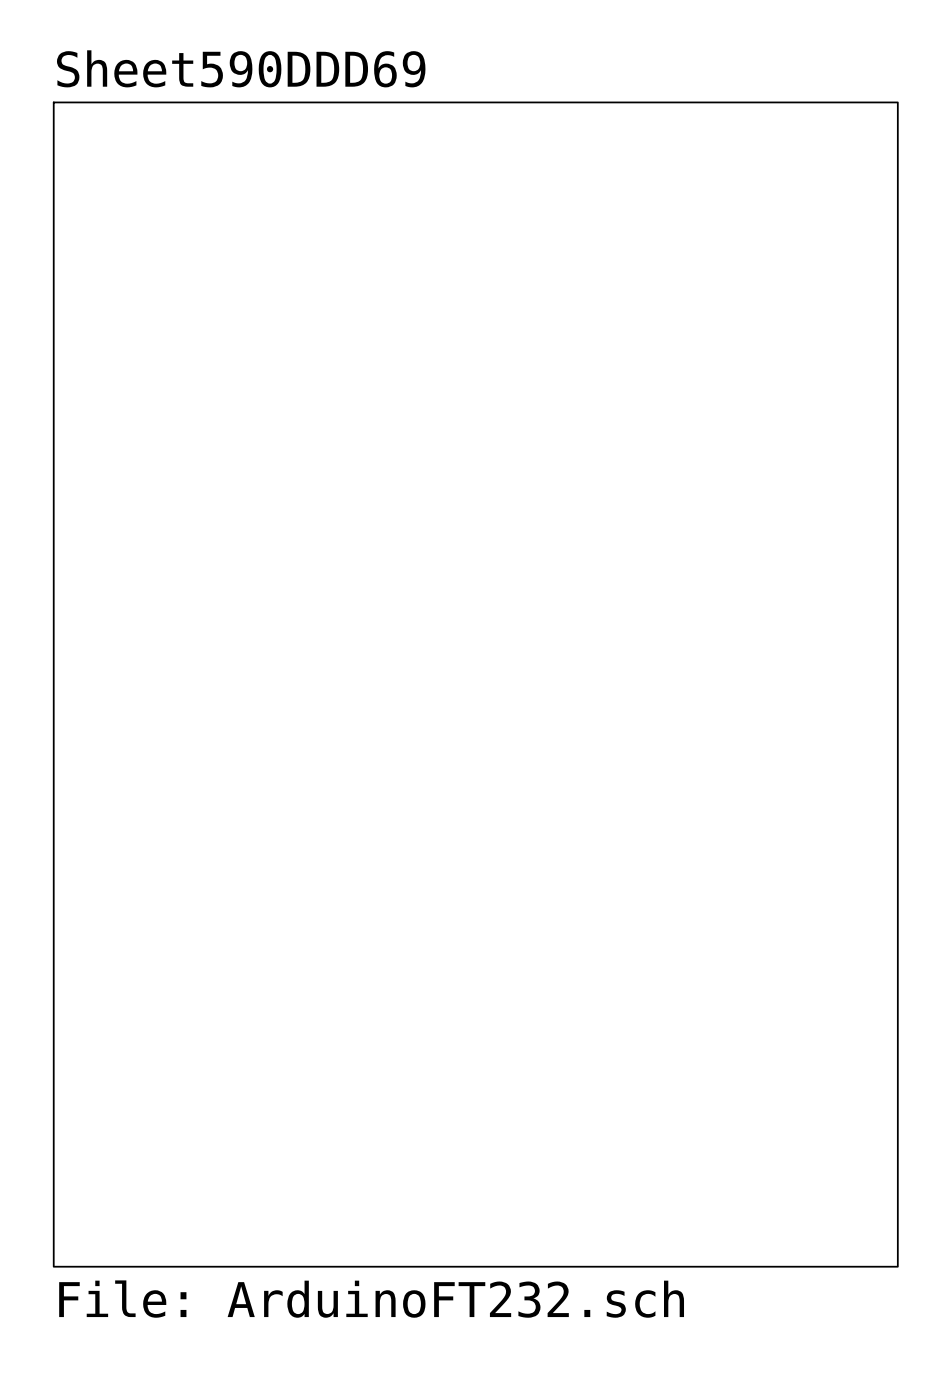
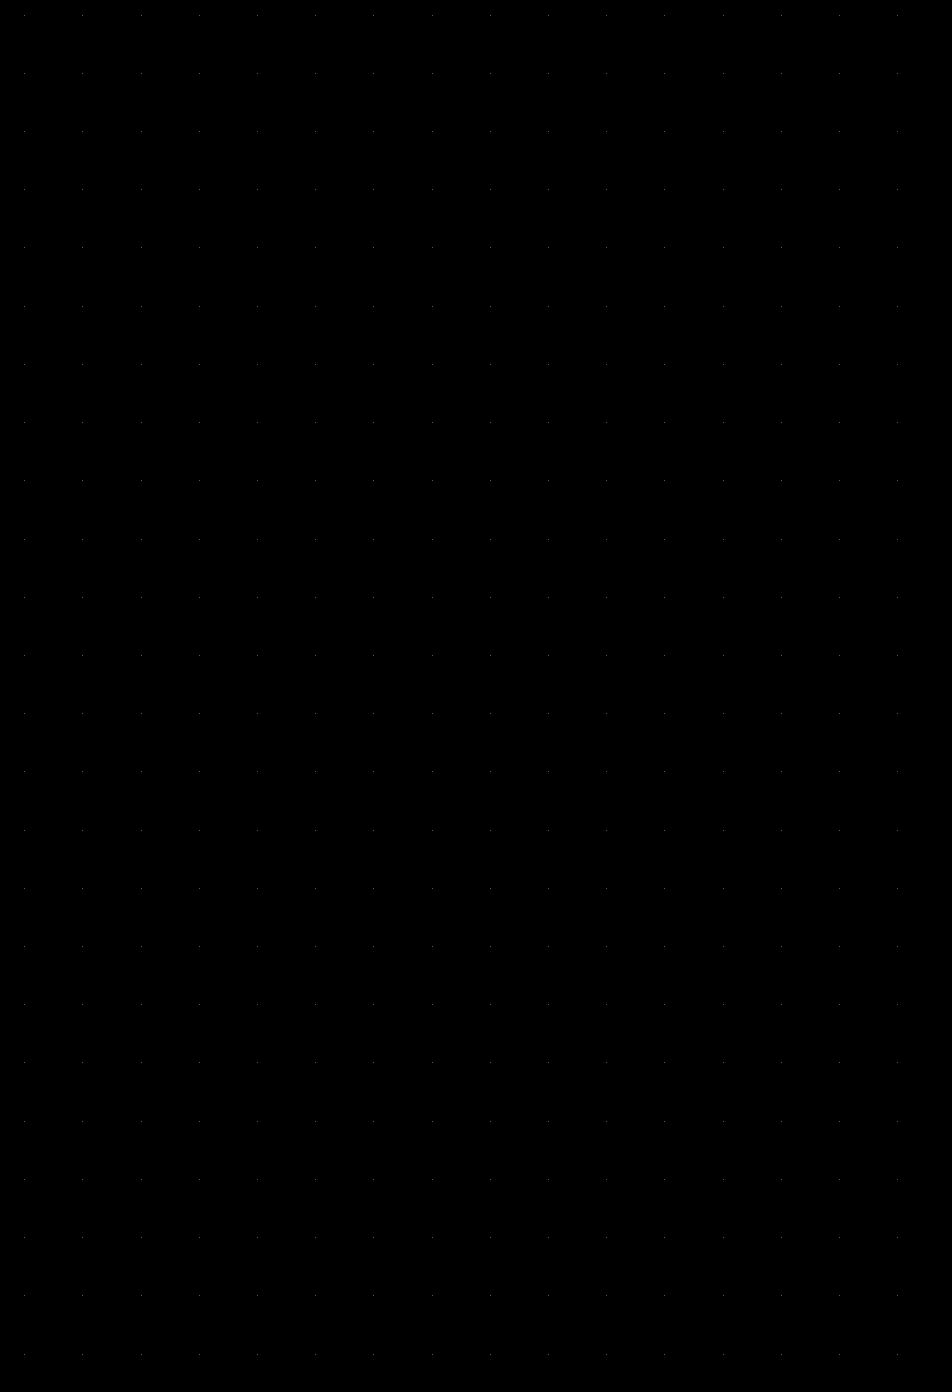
sheet Sheet590DDD69: File: ArduinoFT232.sch (475, 684) -> none

